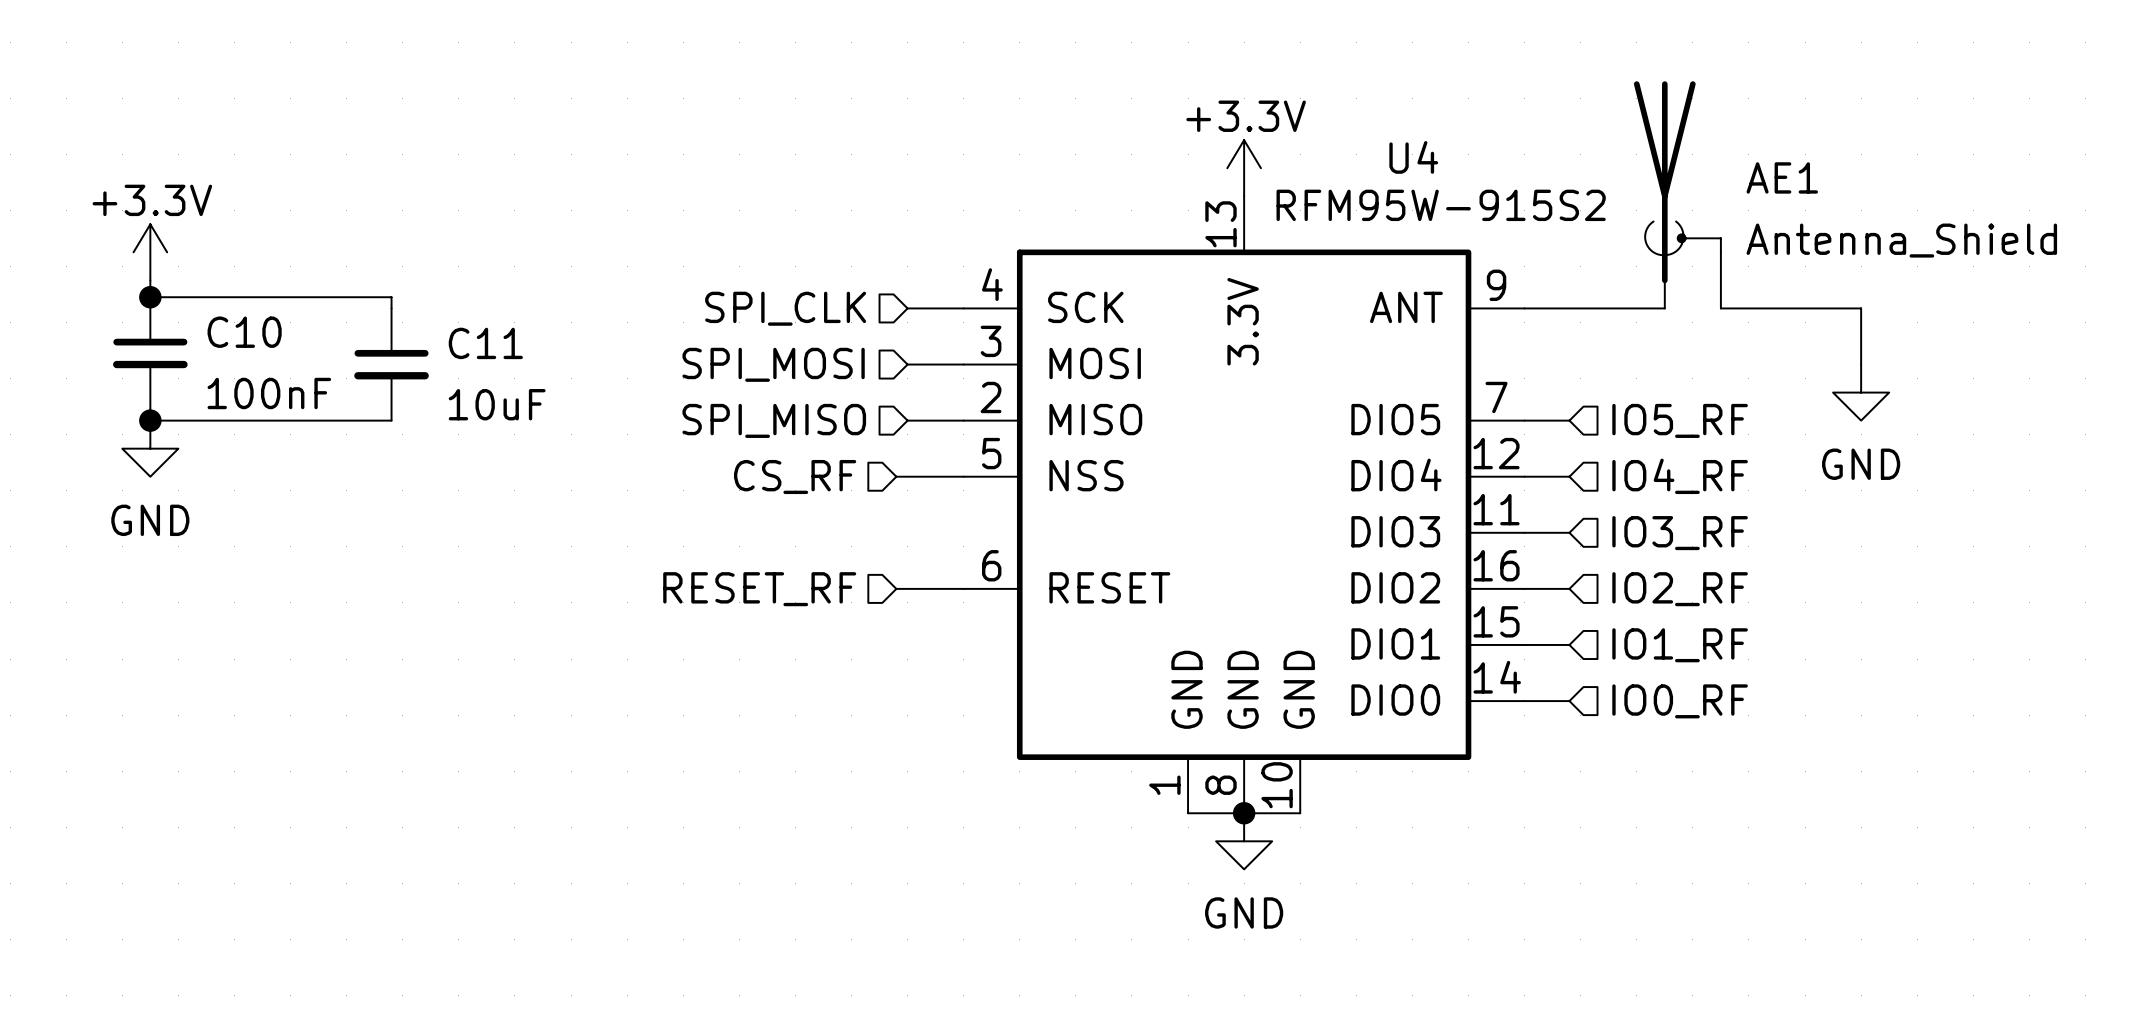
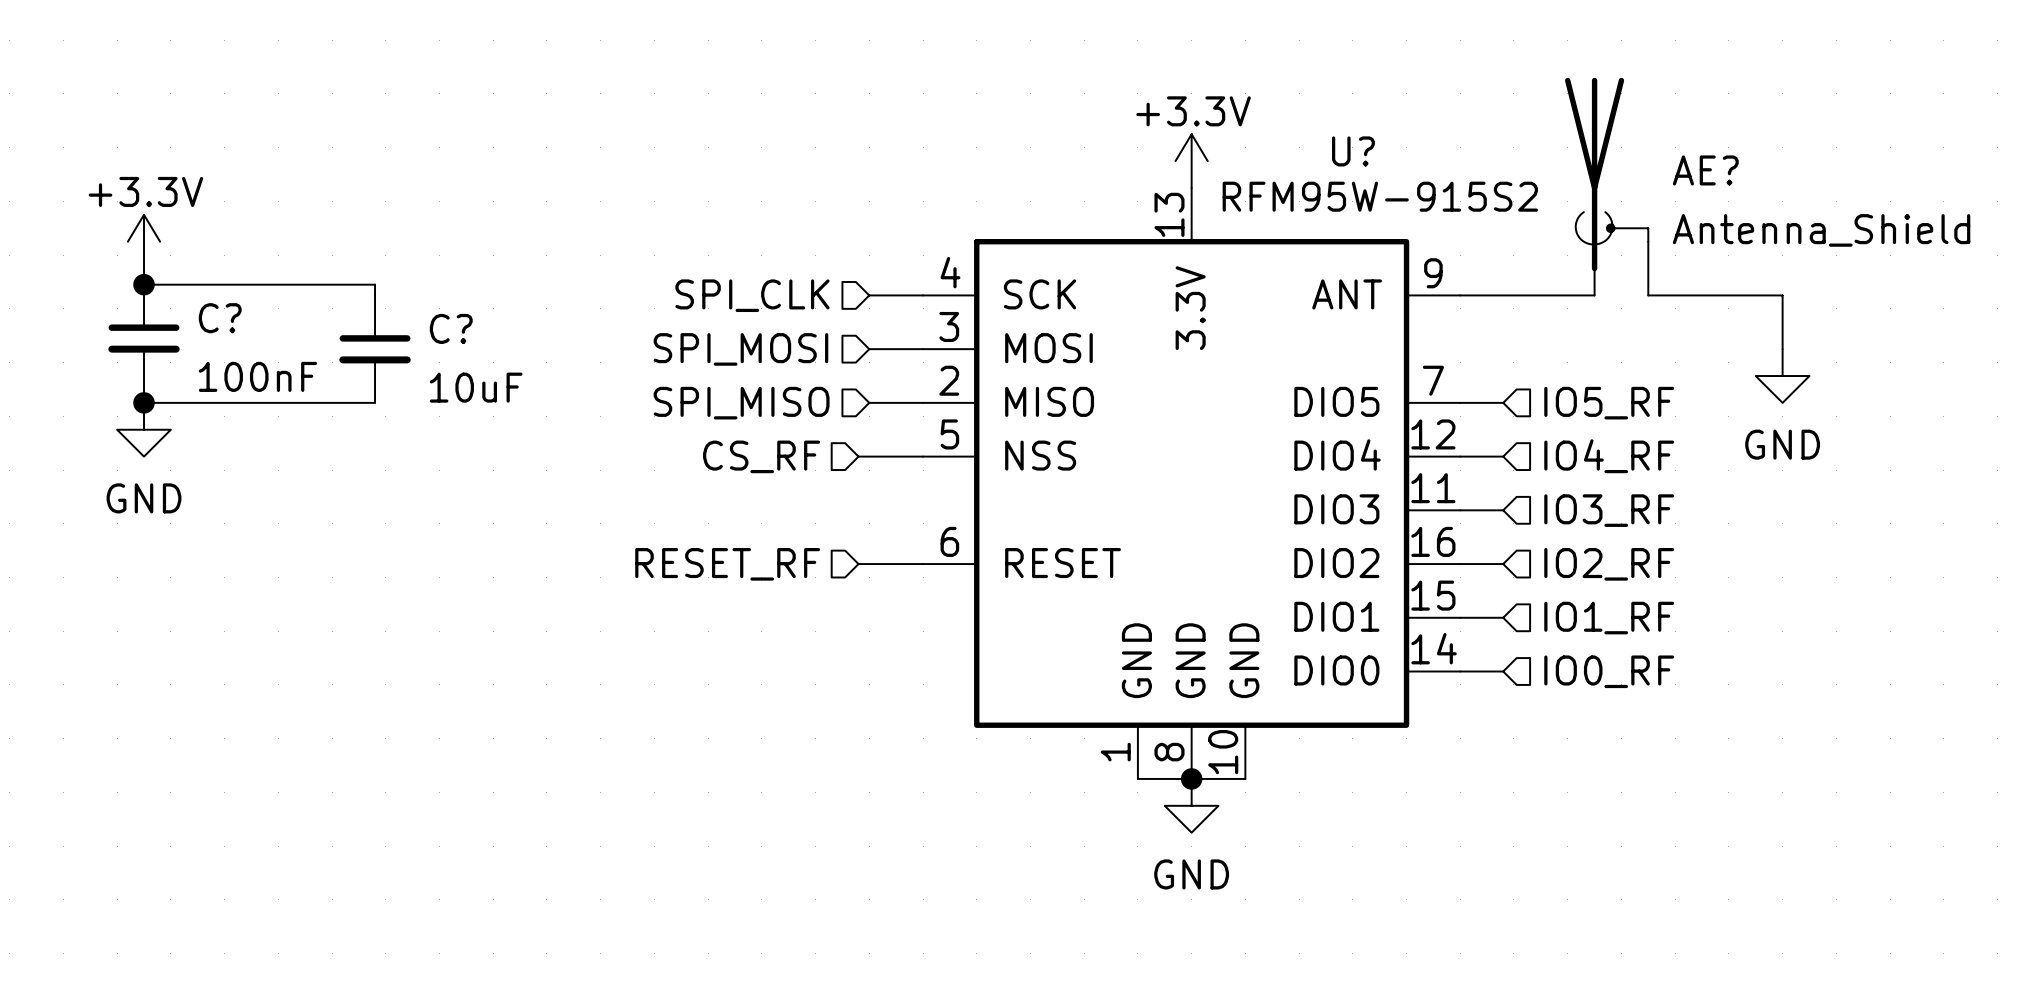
U4 name: U4 (1413, 157) -> U? (1353, 151)
AE1 name: AE1 (1782, 177) -> AE? (1705, 170)
C10 name: C10 (244, 332) -> C? (220, 318)
C11 name: C11 (485, 343) -> C? (451, 328)

